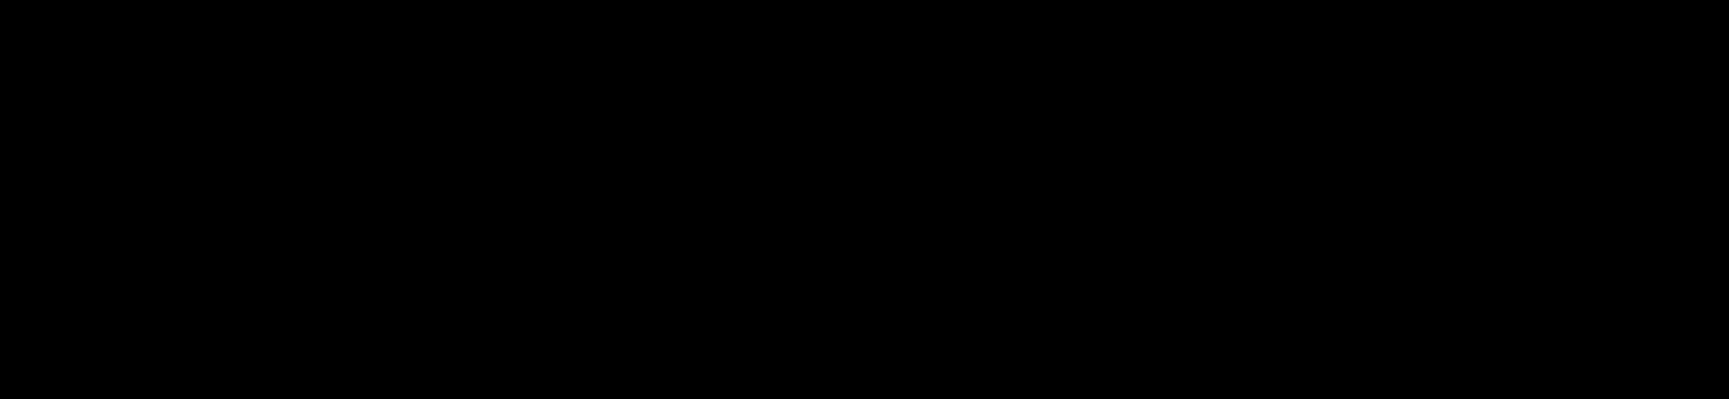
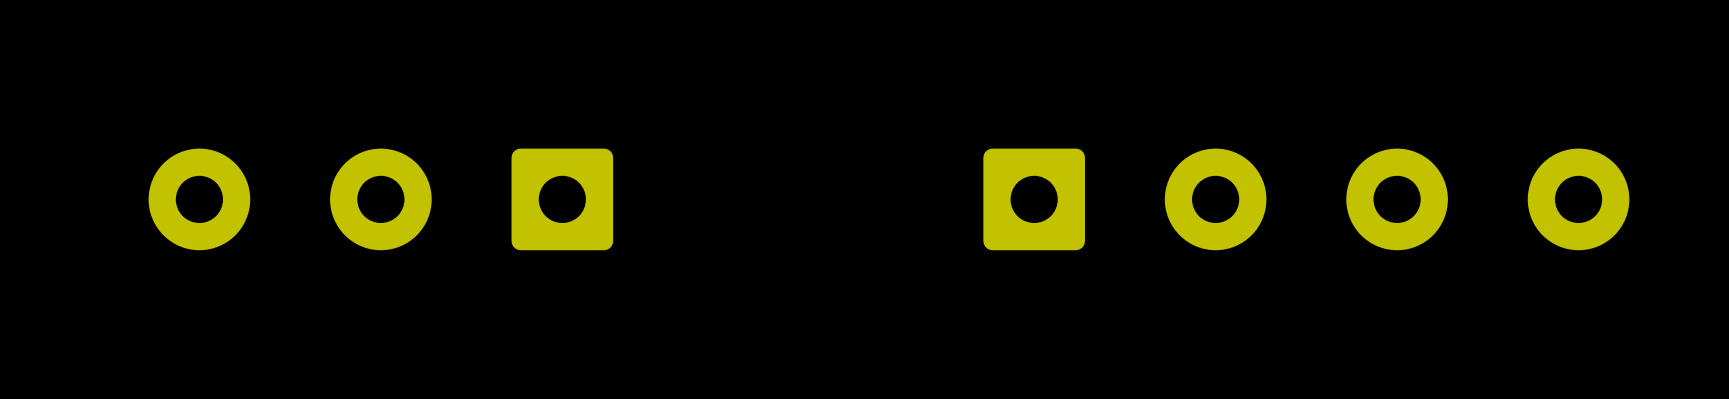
part: none -> (380, 199)
part: none -> (1306, 199)

